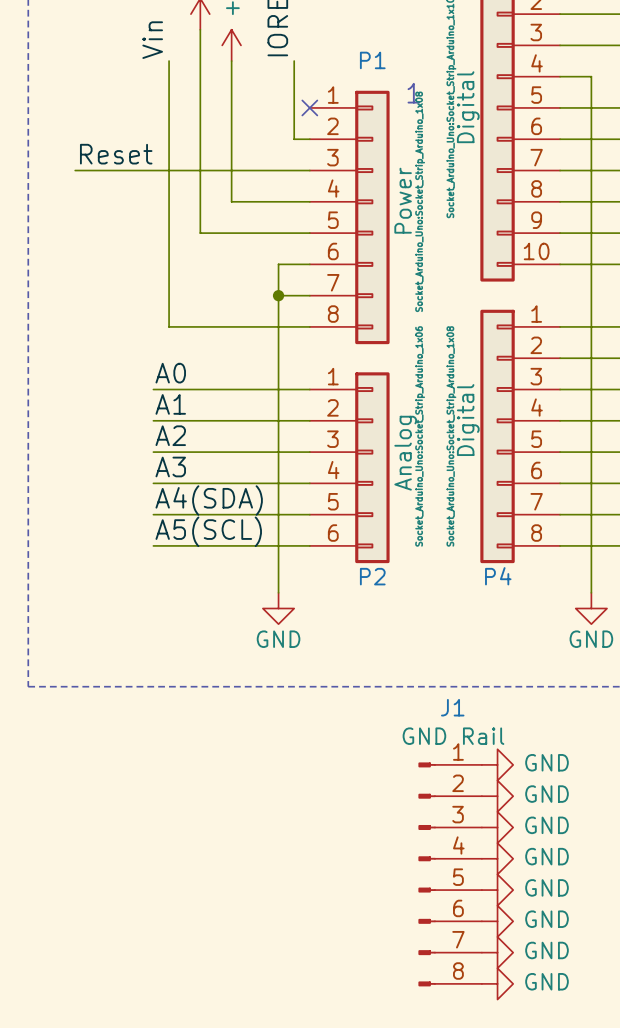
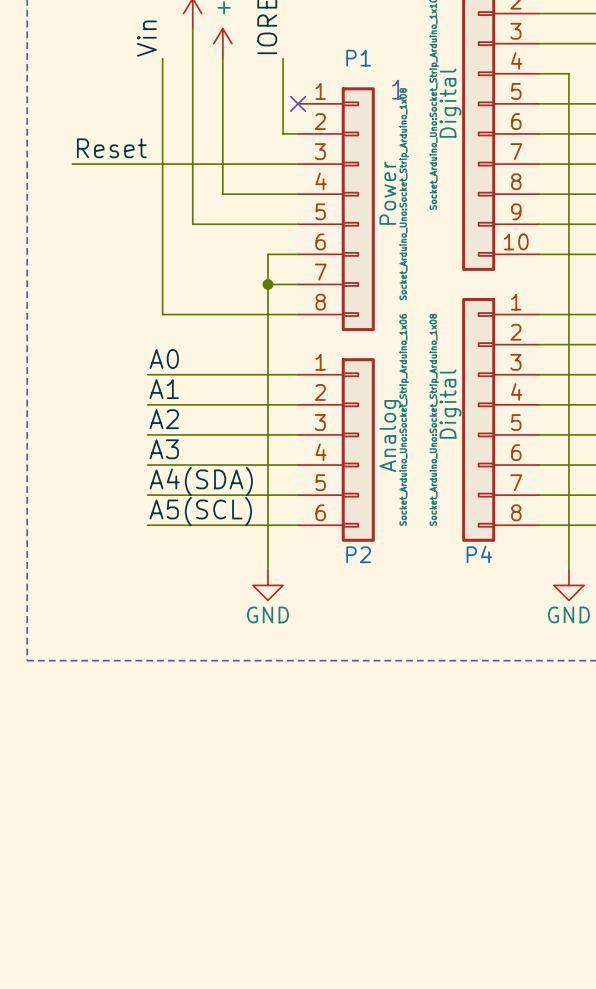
power symbol: GND (497, 764) -> none
power symbol: GND (497, 796) -> none
power symbol: GND (497, 827) -> none
power symbol: GND (497, 858) -> none
J1: GND Rail (450, 874) -> none
power symbol: GND (497, 890) -> none
power symbol: GND (497, 921) -> none
power symbol: GND (497, 952) -> none
power symbol: GND (497, 983) -> none

